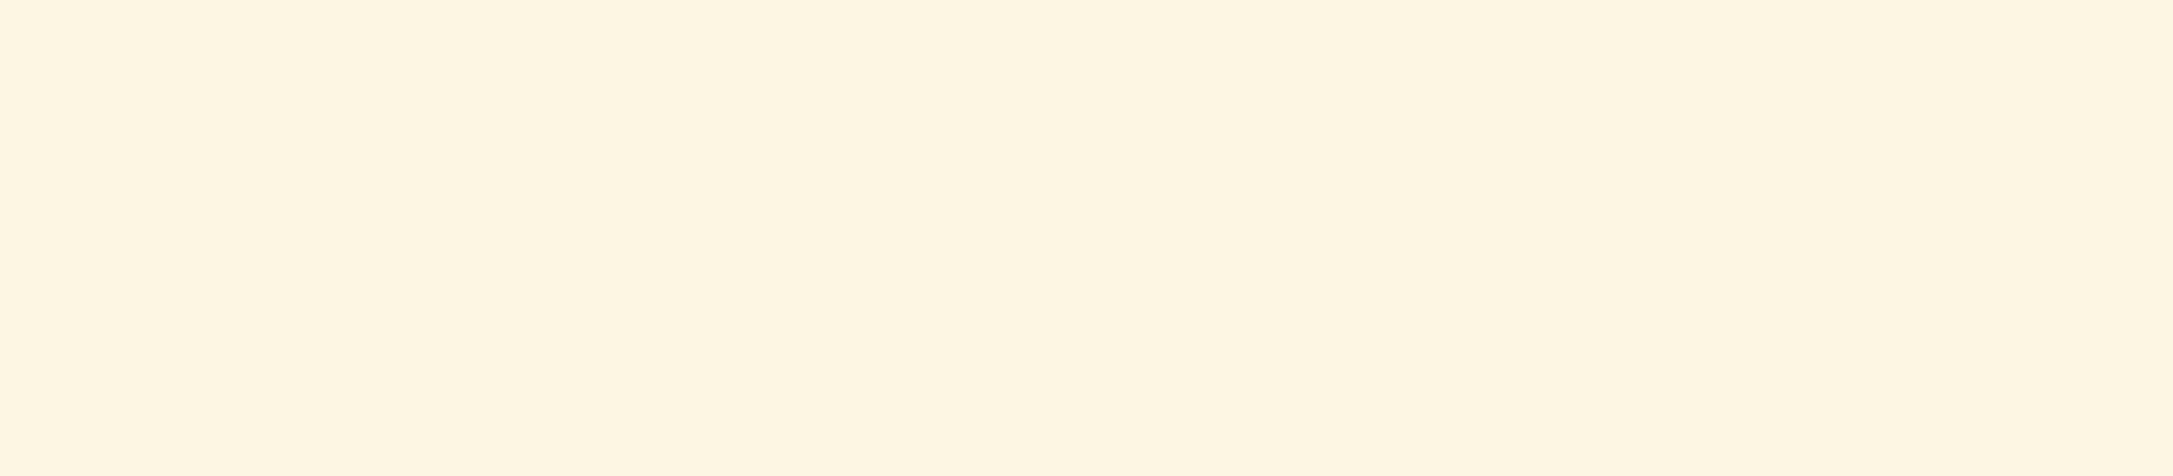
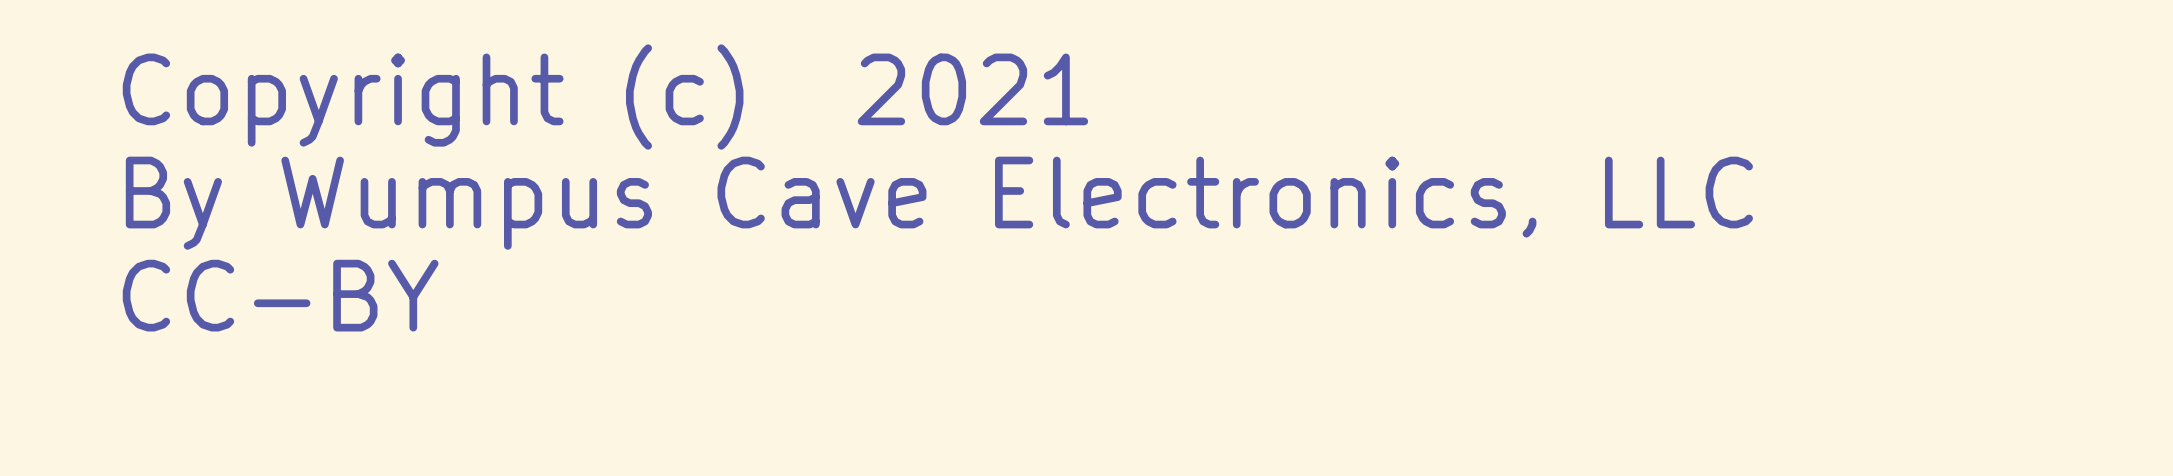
text: none -> Copyright (c) 2021 (605, 97)
text: none -> By Wumpus Cave Electronics, LLC (939, 203)
text: none -> CC-BY (280, 295)

